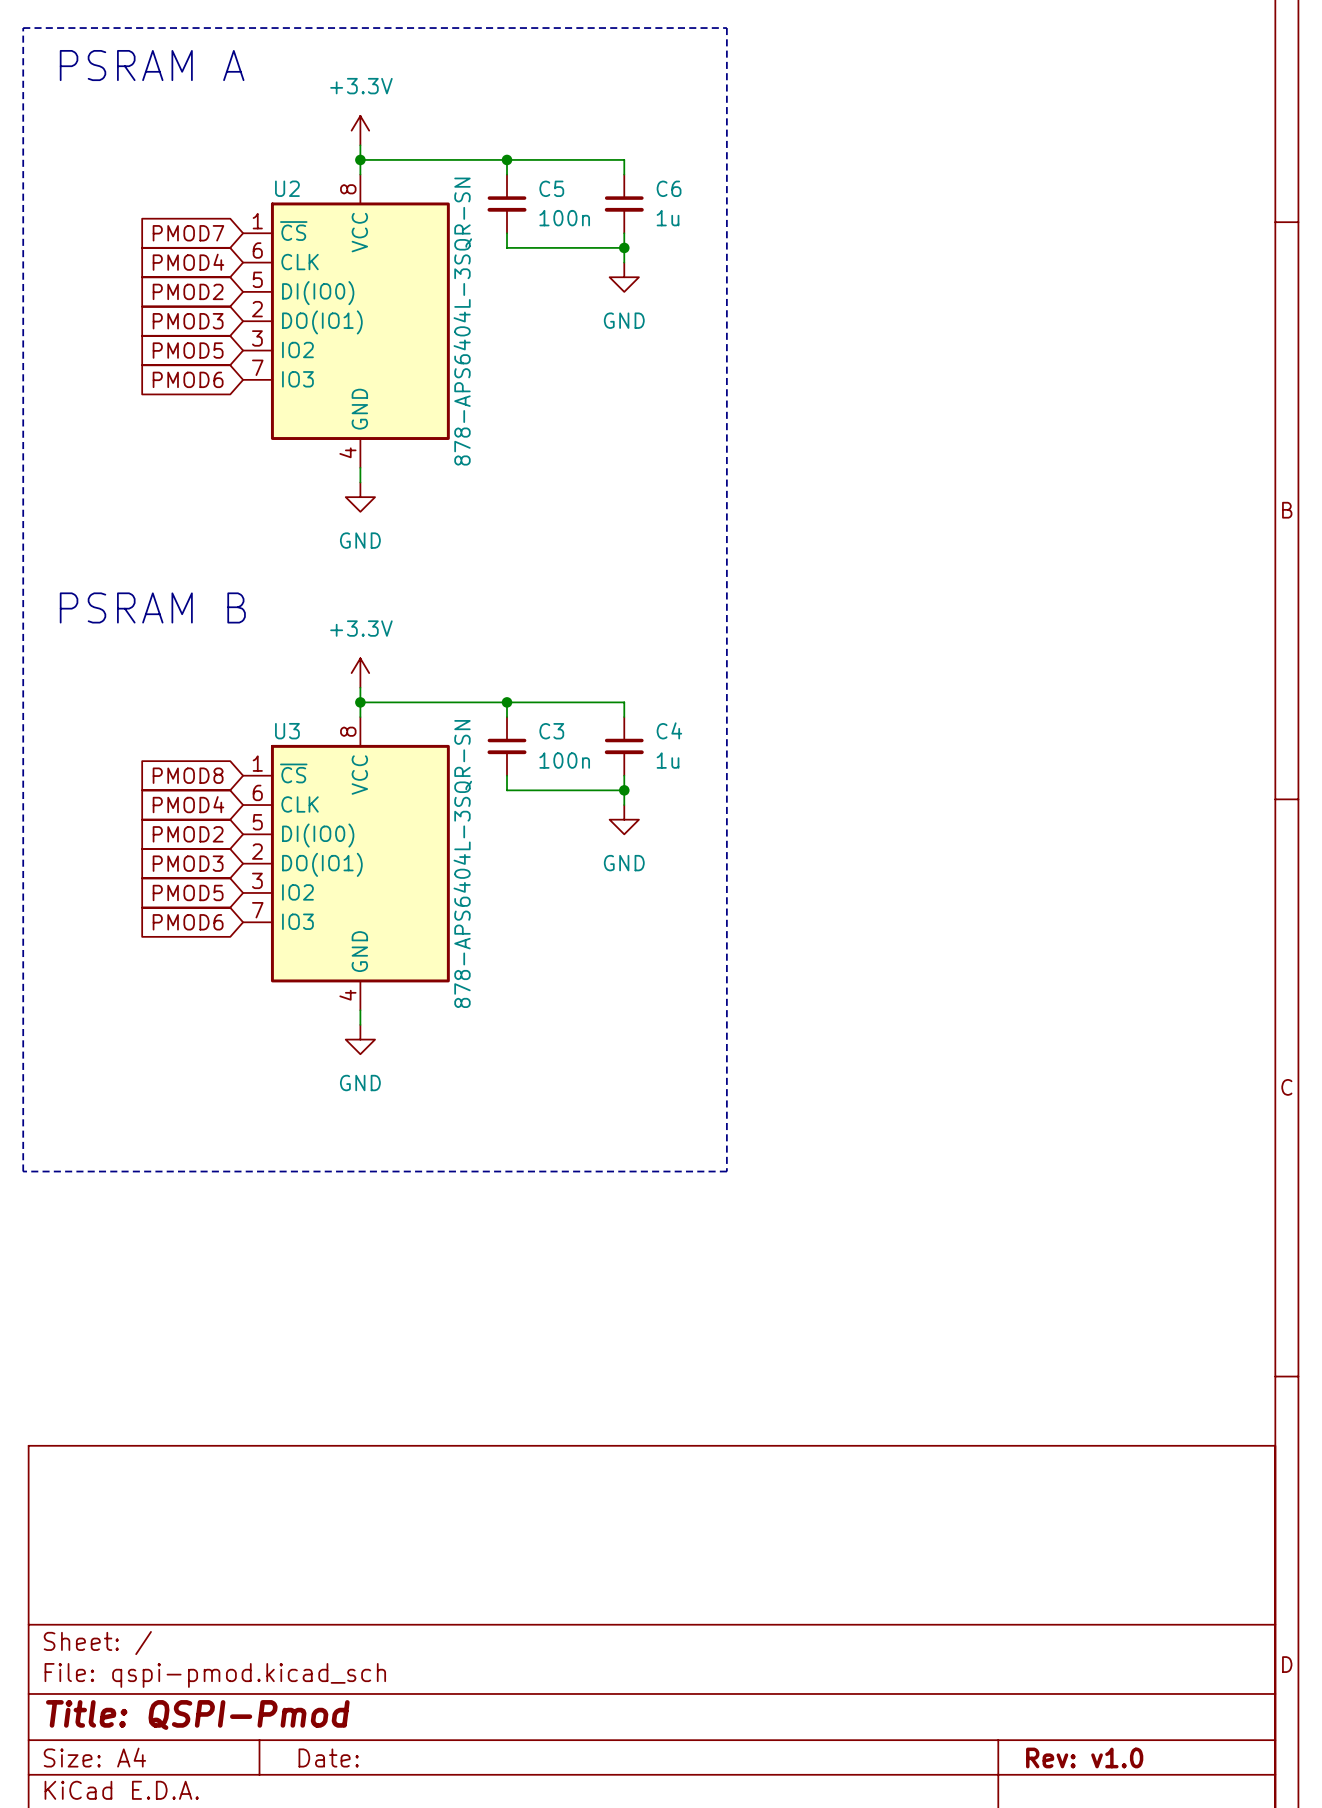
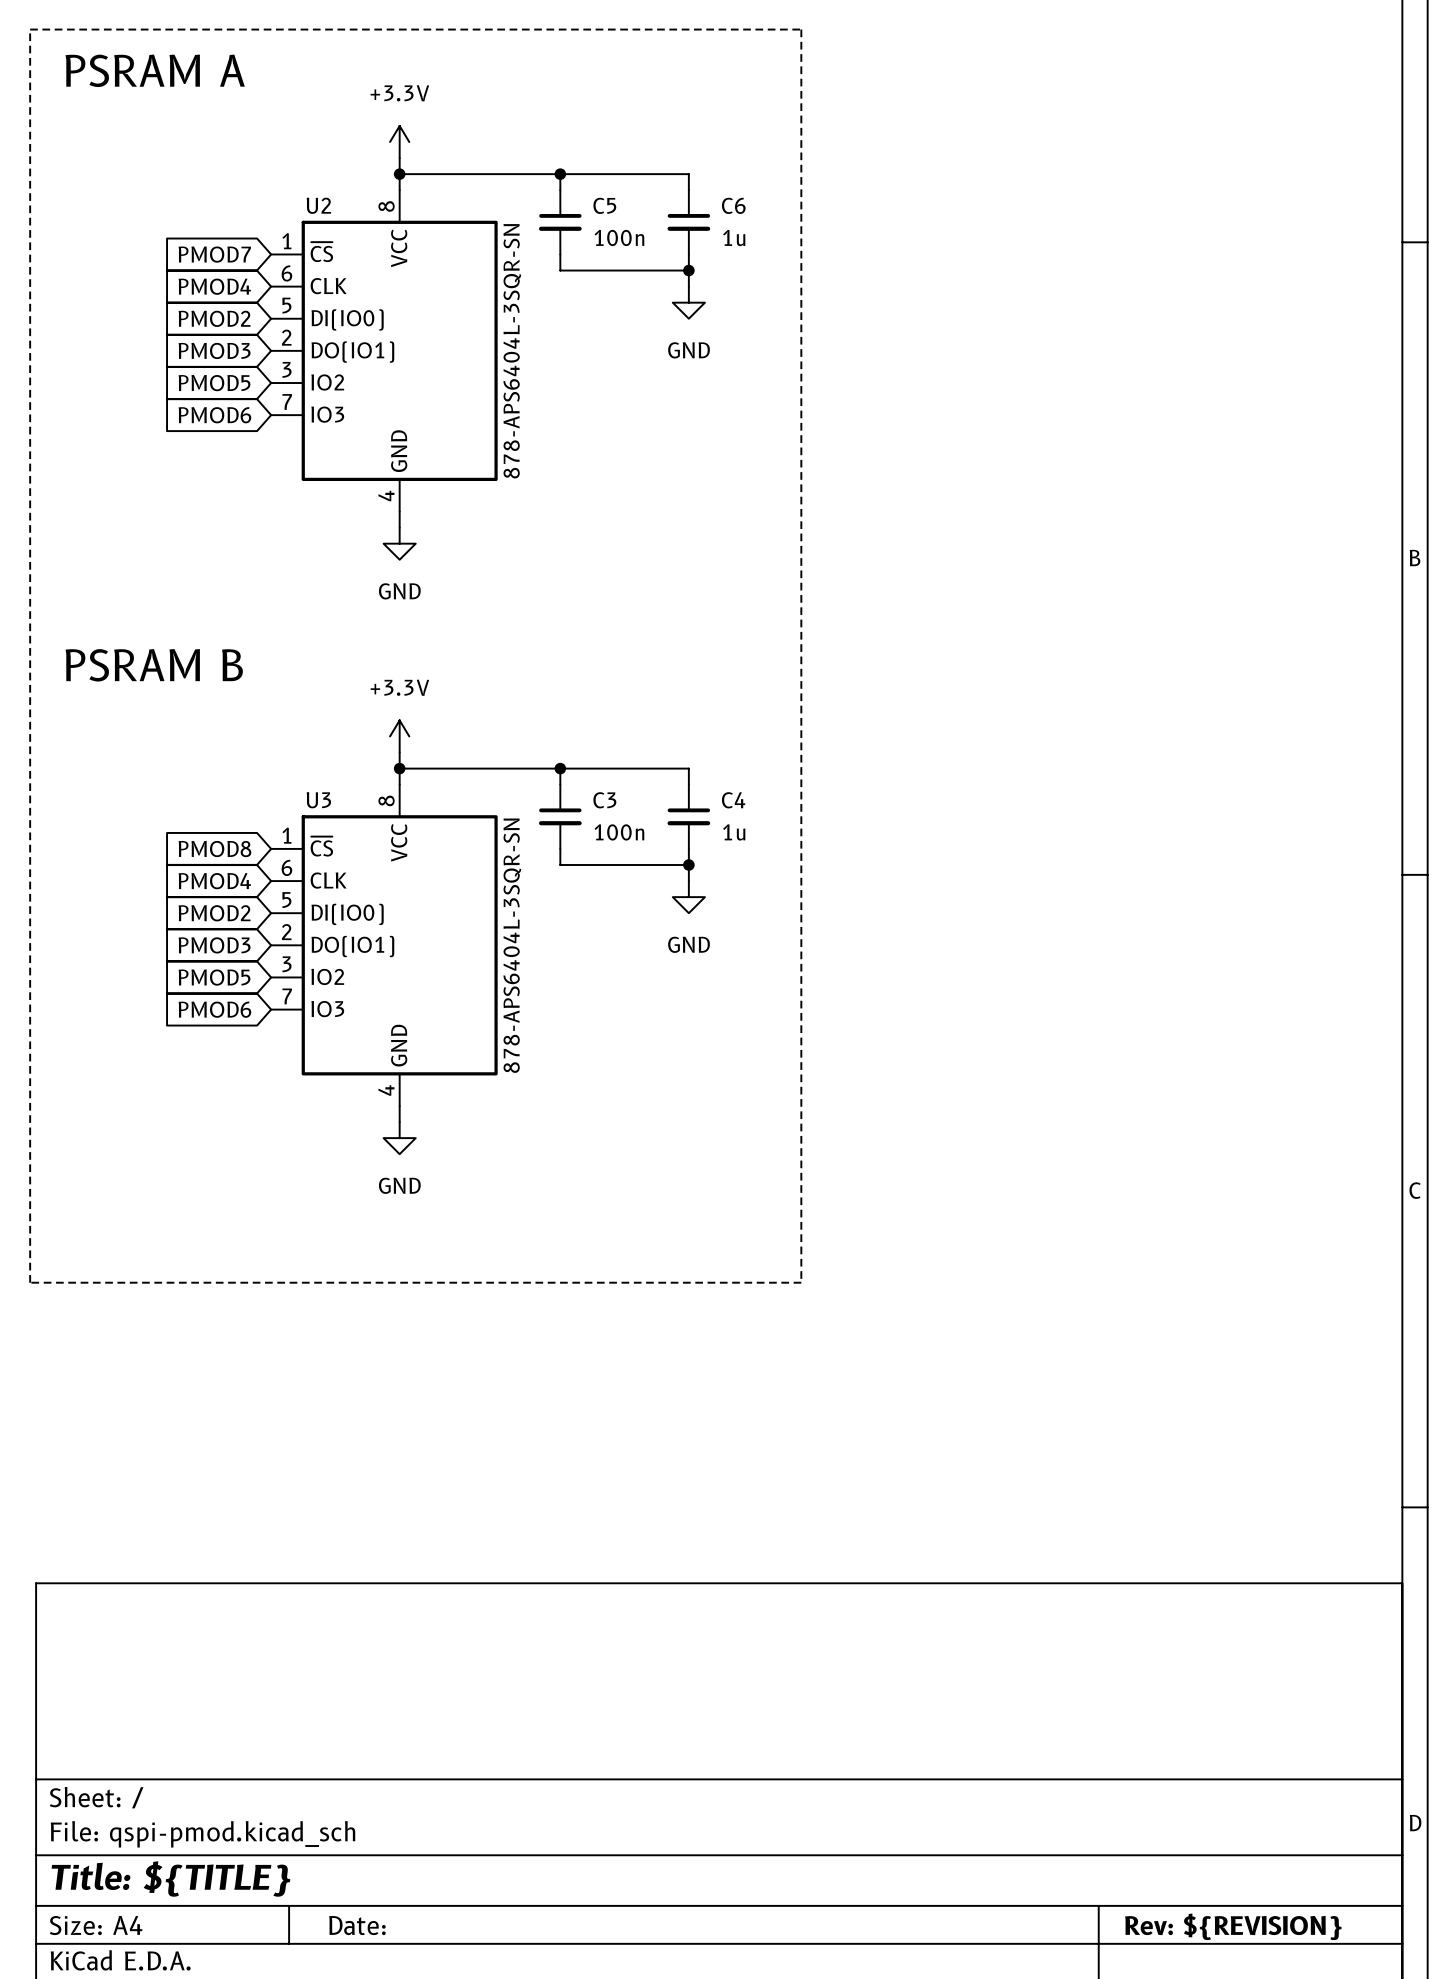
title block: Title: QSPI-Pmod (197, 1715) -> Title: ${TITLE} (170, 1878)
title block: Rev: v1.0 (1084, 1757) -> Rev: ${REVISION} (1233, 1926)

